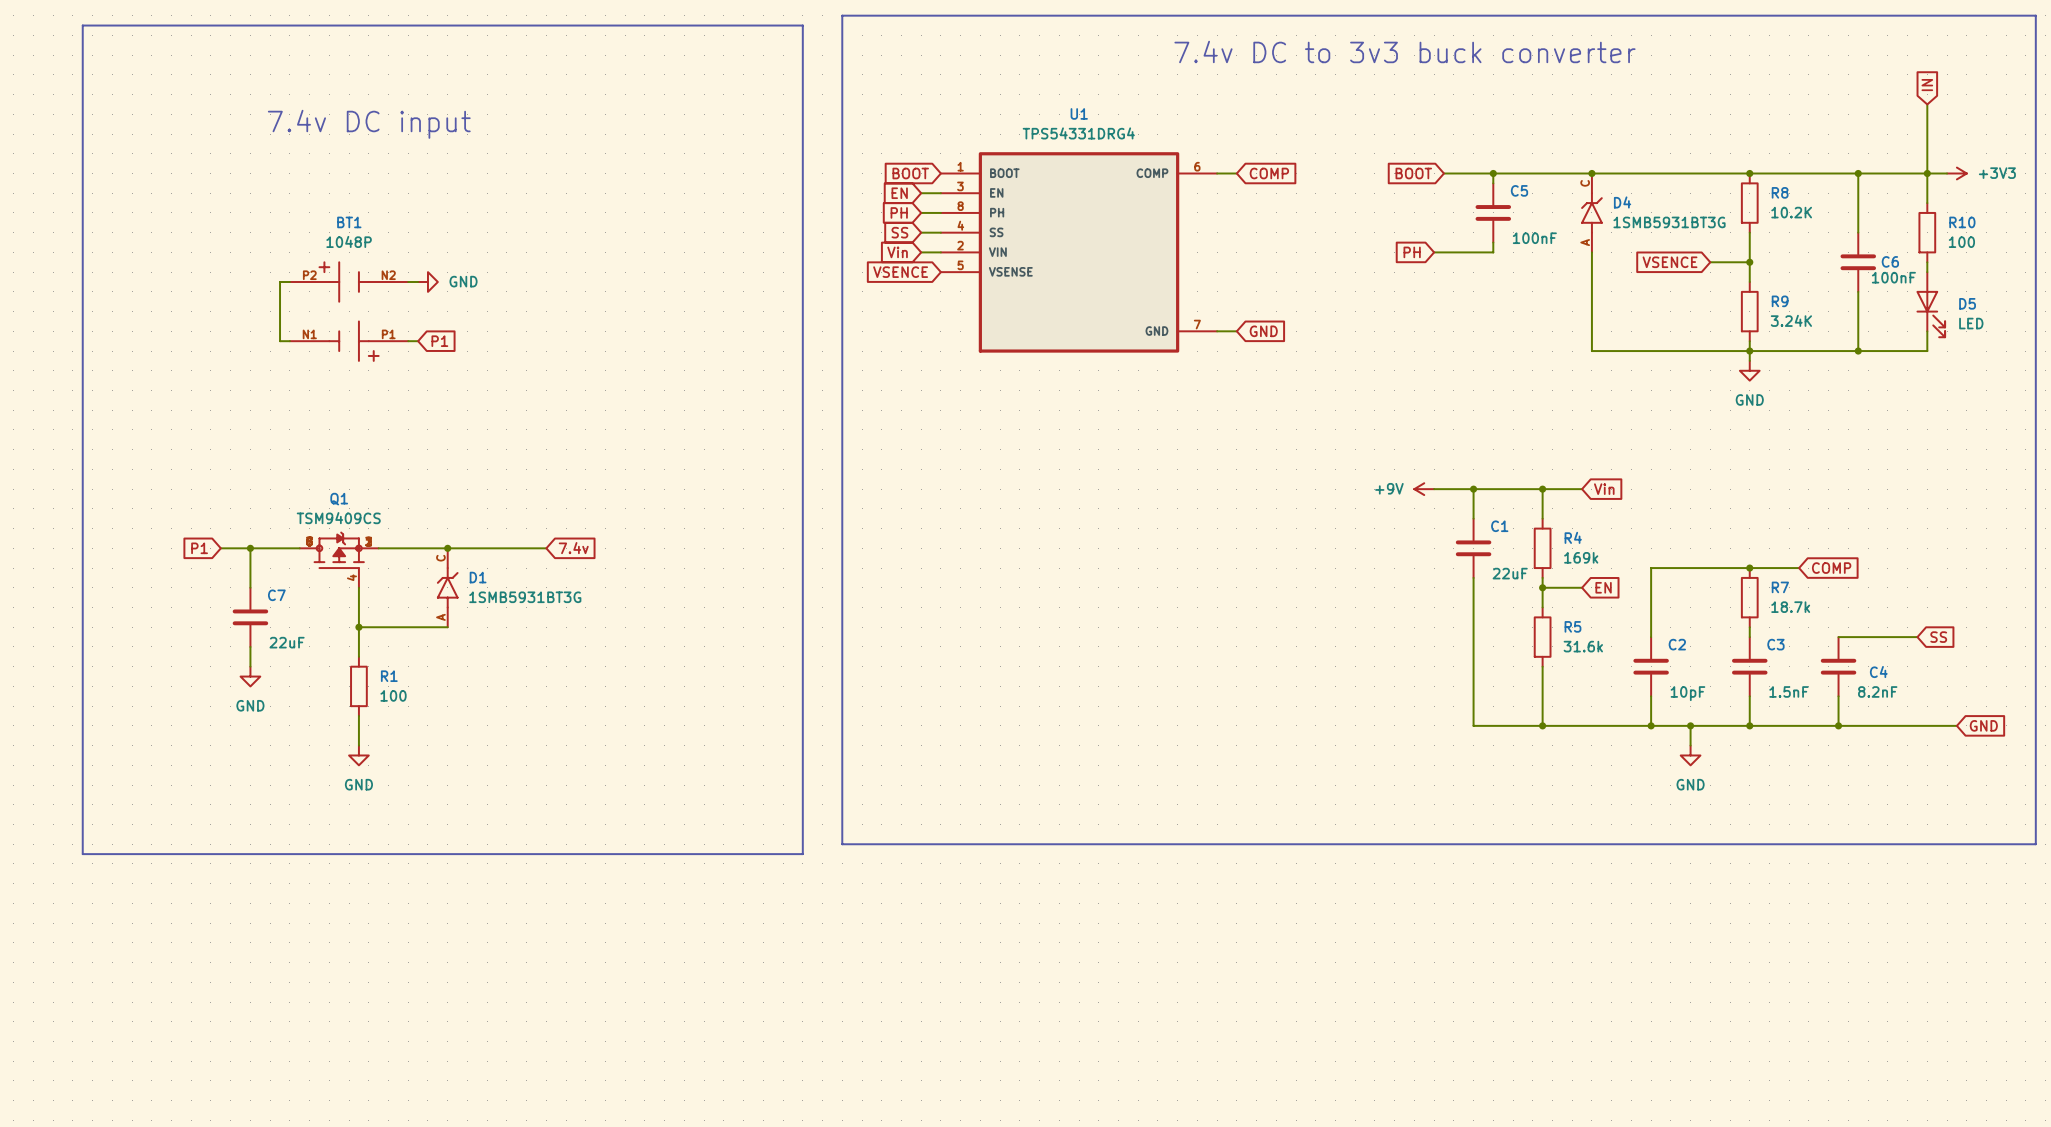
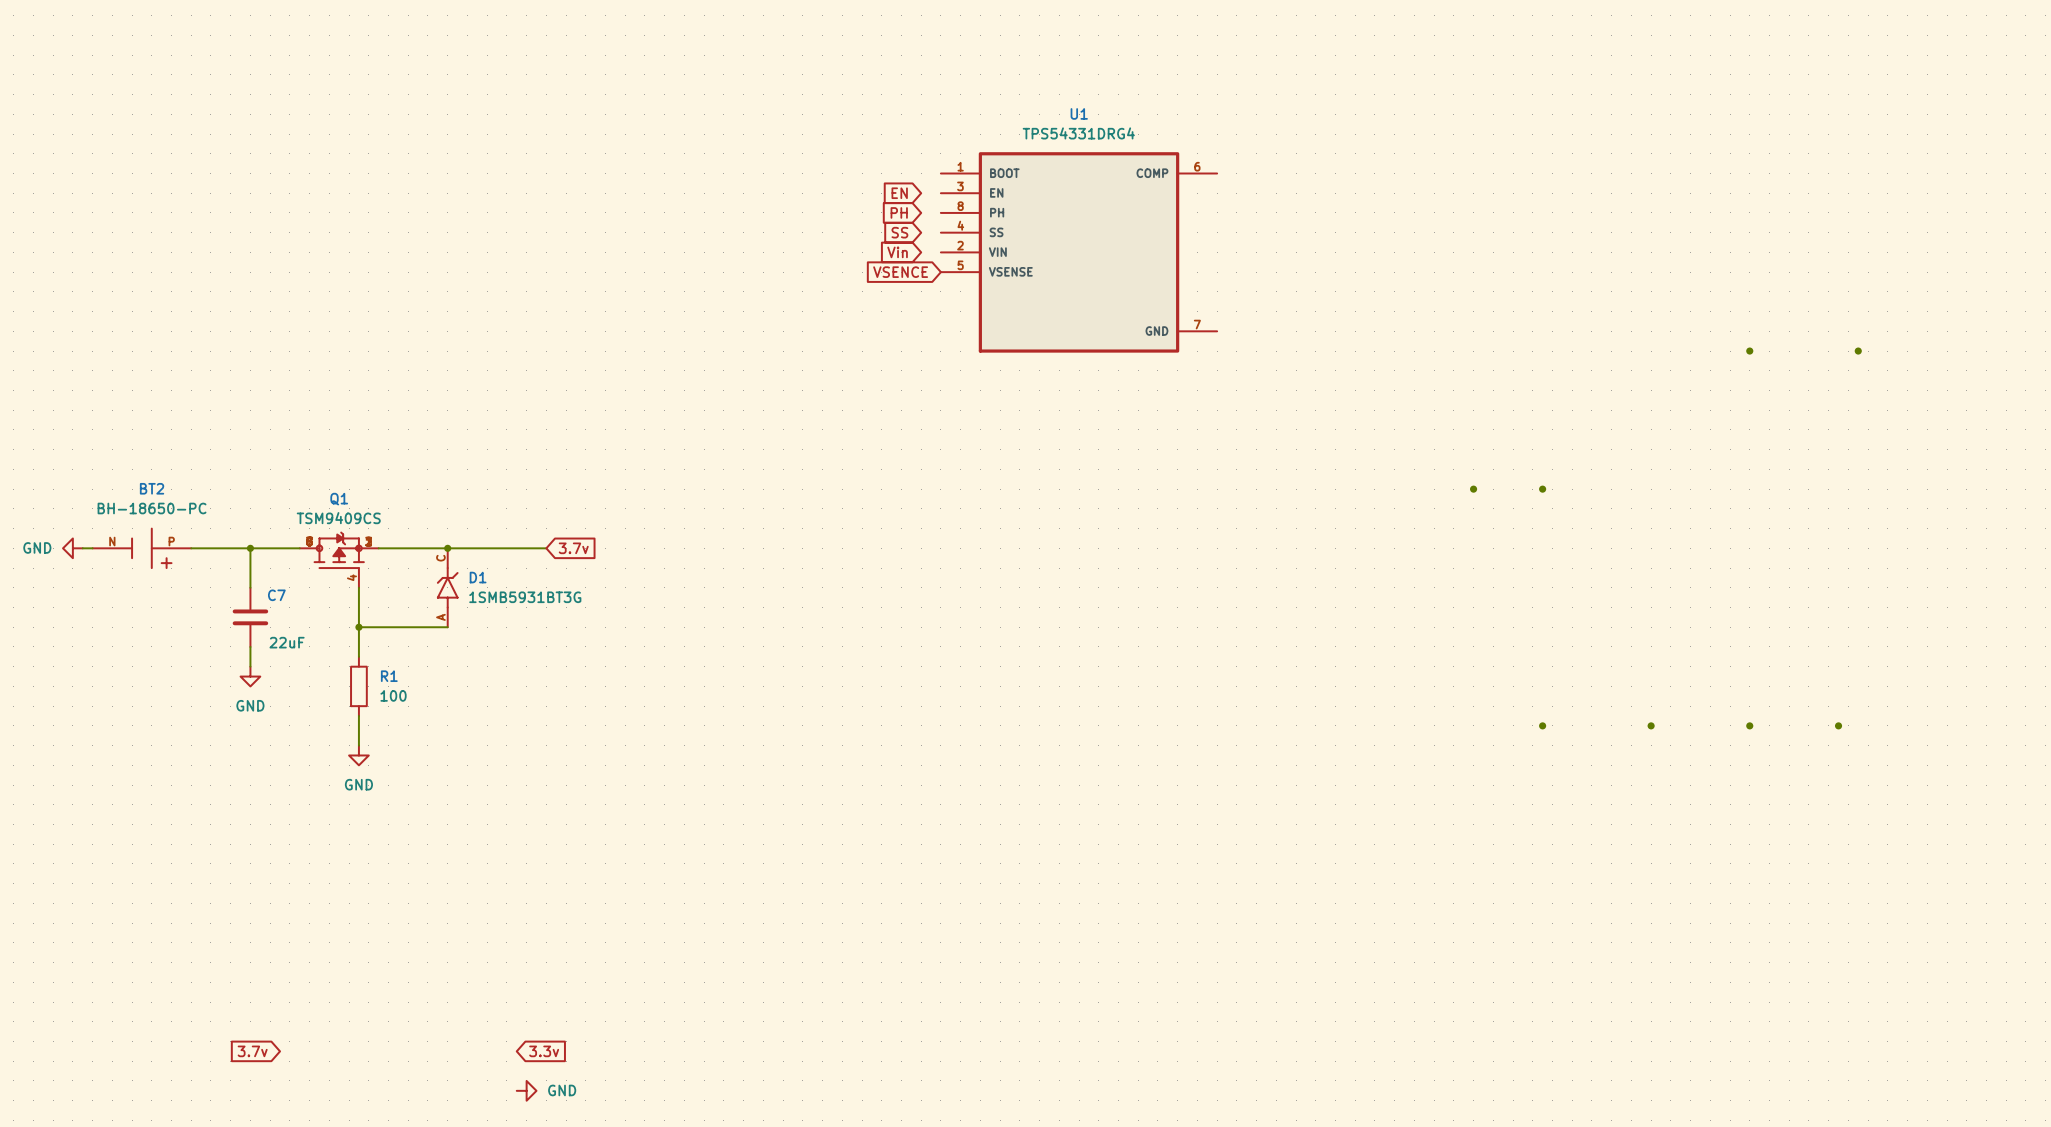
line: (842, 15) (2035, 15) (2035, 844) (842, 844) (842, 15) -> none
line: (82, 25) (802, 25) (802, 854) (82, 854) (82, 25) -> none
text: 7.4v DC to 3v3 buck converter (1404, 51) -> none
global label: IN (1927, 85) -> none
wire: (1927, 104) (1927, 203) -> none
text: 7.4v DC input (369, 124) -> none
global label: BOOT (910, 173) -> none
wire: (1217, 173) (1236, 173) -> none
global label: COMP (1269, 173) -> none
global label: BOOT (1413, 173) -> none
wire: (1443, 173) (1947, 173) -> none
wire: (1493, 173) (1493, 183) -> none
junction: (1493, 173) -> none
junction: (1591, 173) -> none
junction: (1749, 173) -> none
wire: (1858, 173) (1858, 232) -> none
junction: (1858, 173) -> none
junction: (1927, 173) -> none
power symbol: +3V3 (1956, 173) -> none
wire: (921, 193) (940, 193) -> none
R8: 10.2K (1749, 203) -> none
wire: (921, 212) (940, 212) -> none
C5: 100nF (1493, 212) -> none
D4: 1SMB5931BT3G (1591, 212) -> none
wire: (921, 232) (940, 232) -> none
wire: (1749, 232) (1749, 282) -> none
R10: 100 (1927, 232) -> none
wire: (1493, 242) (1493, 252) (1434, 252) -> none
wire: (921, 252) (940, 252) -> none
global label: PH (1412, 252) -> none
wire: (1591, 252) (1591, 351) (1927, 351) (1927, 331) -> none
global label: VSENCE (1670, 262) -> none
wire: (1710, 262) (1749, 262) -> none
junction: (1749, 262) -> none
C6: 100nF (1858, 262) -> none
wire: (1927, 262) (1927, 272) -> none
wire: (289, 282) (280, 282) (280, 341) (289, 341) -> none
wire: (408, 282) (418, 282) -> none
power symbol: GND (427, 282) -> none
wire: (1858, 291) (1858, 351) -> none
D5: LED (1930, 304) -> none
BT1: 1048P (349, 311) -> none
R9: 3.24K (1749, 311) -> none
wire: (1217, 331) (1236, 331) -> none
global label: GND (1263, 331) -> none
wire: (408, 341) (418, 341) -> none
global label: P1 (439, 341) -> none
wire: (1749, 341) (1749, 360) -> none
power symbol: GND (1749, 370) -> none
power symbol: +9V (1424, 489) -> none
wire: (1434, 489) (1582, 489) -> none
wire: (1473, 489) (1473, 518) -> none
wire: (1542, 489) (1542, 518) -> none
global label: Vin (1604, 489) -> none
power symbol: none -> GND (72, 548)
wire: none -> (82, 548) (92, 548)
BT2: none -> BH-18650-PC (141, 548)
wire: none -> (191, 548) (220, 548)
global label: P1 (199, 548) -> none
global label: 7.4v (573, 548) -> 3.7v (573, 548)
C1: 22uF (1473, 548) -> none
R4: 169k (1542, 548) -> none
junction: (1749, 568) -> none
wire: (1799, 568) (1651, 568) (1651, 637) -> none
global label: COMP (1831, 568) -> none
wire: (1473, 577) (1473, 725) (1956, 725) -> none
wire: (1542, 577) (1542, 607) -> none
wire: (1542, 587) (1582, 587) -> none
junction: (1542, 587) -> none
global label: EN (1603, 587) -> none
R7: 18.7k (1749, 597) -> none
wire: (1749, 627) (1749, 637) -> none
R5: 31.6k (1542, 637) -> none
wire: (1838, 637) (1917, 637) -> none
global label: SS (1938, 637) -> none
wire: (1542, 666) (1542, 725) -> none
C2: 10pF (1651, 666) -> none
C3: 1.5nF (1749, 666) -> none
C4: 8.2nF (1838, 666) -> none
wire: (1651, 696) (1651, 725) -> none
wire: (1749, 696) (1749, 725) -> none
wire: (1838, 696) (1838, 725) -> none
wire: (1690, 725) (1690, 745) -> none
junction: (1690, 725) -> none
global label: GND (1983, 725) -> none
power symbol: GND (1690, 755) -> none
global label: none -> 3.7v (252, 1051)
global label: none -> 3.3v (544, 1051)
power symbol: none -> GND (526, 1090)

